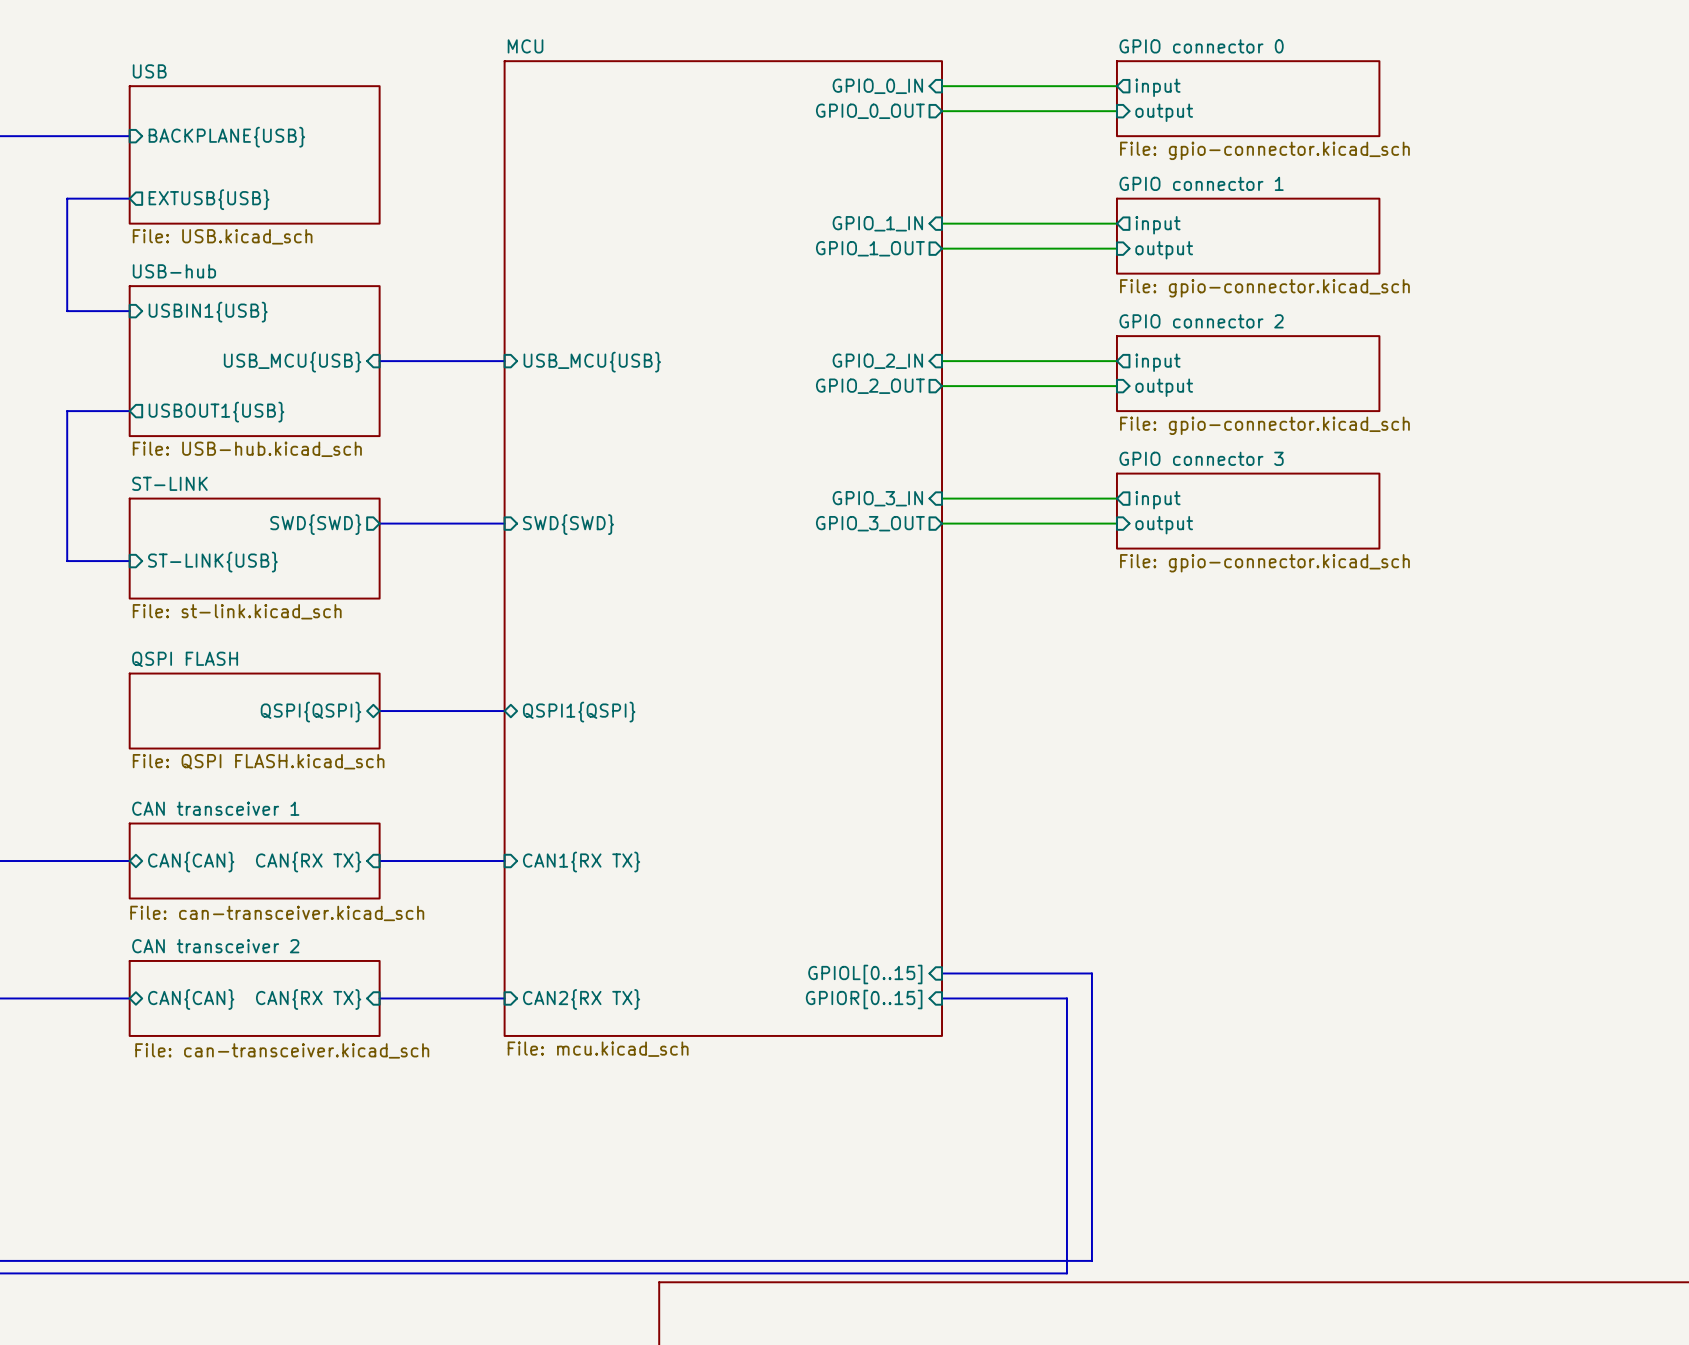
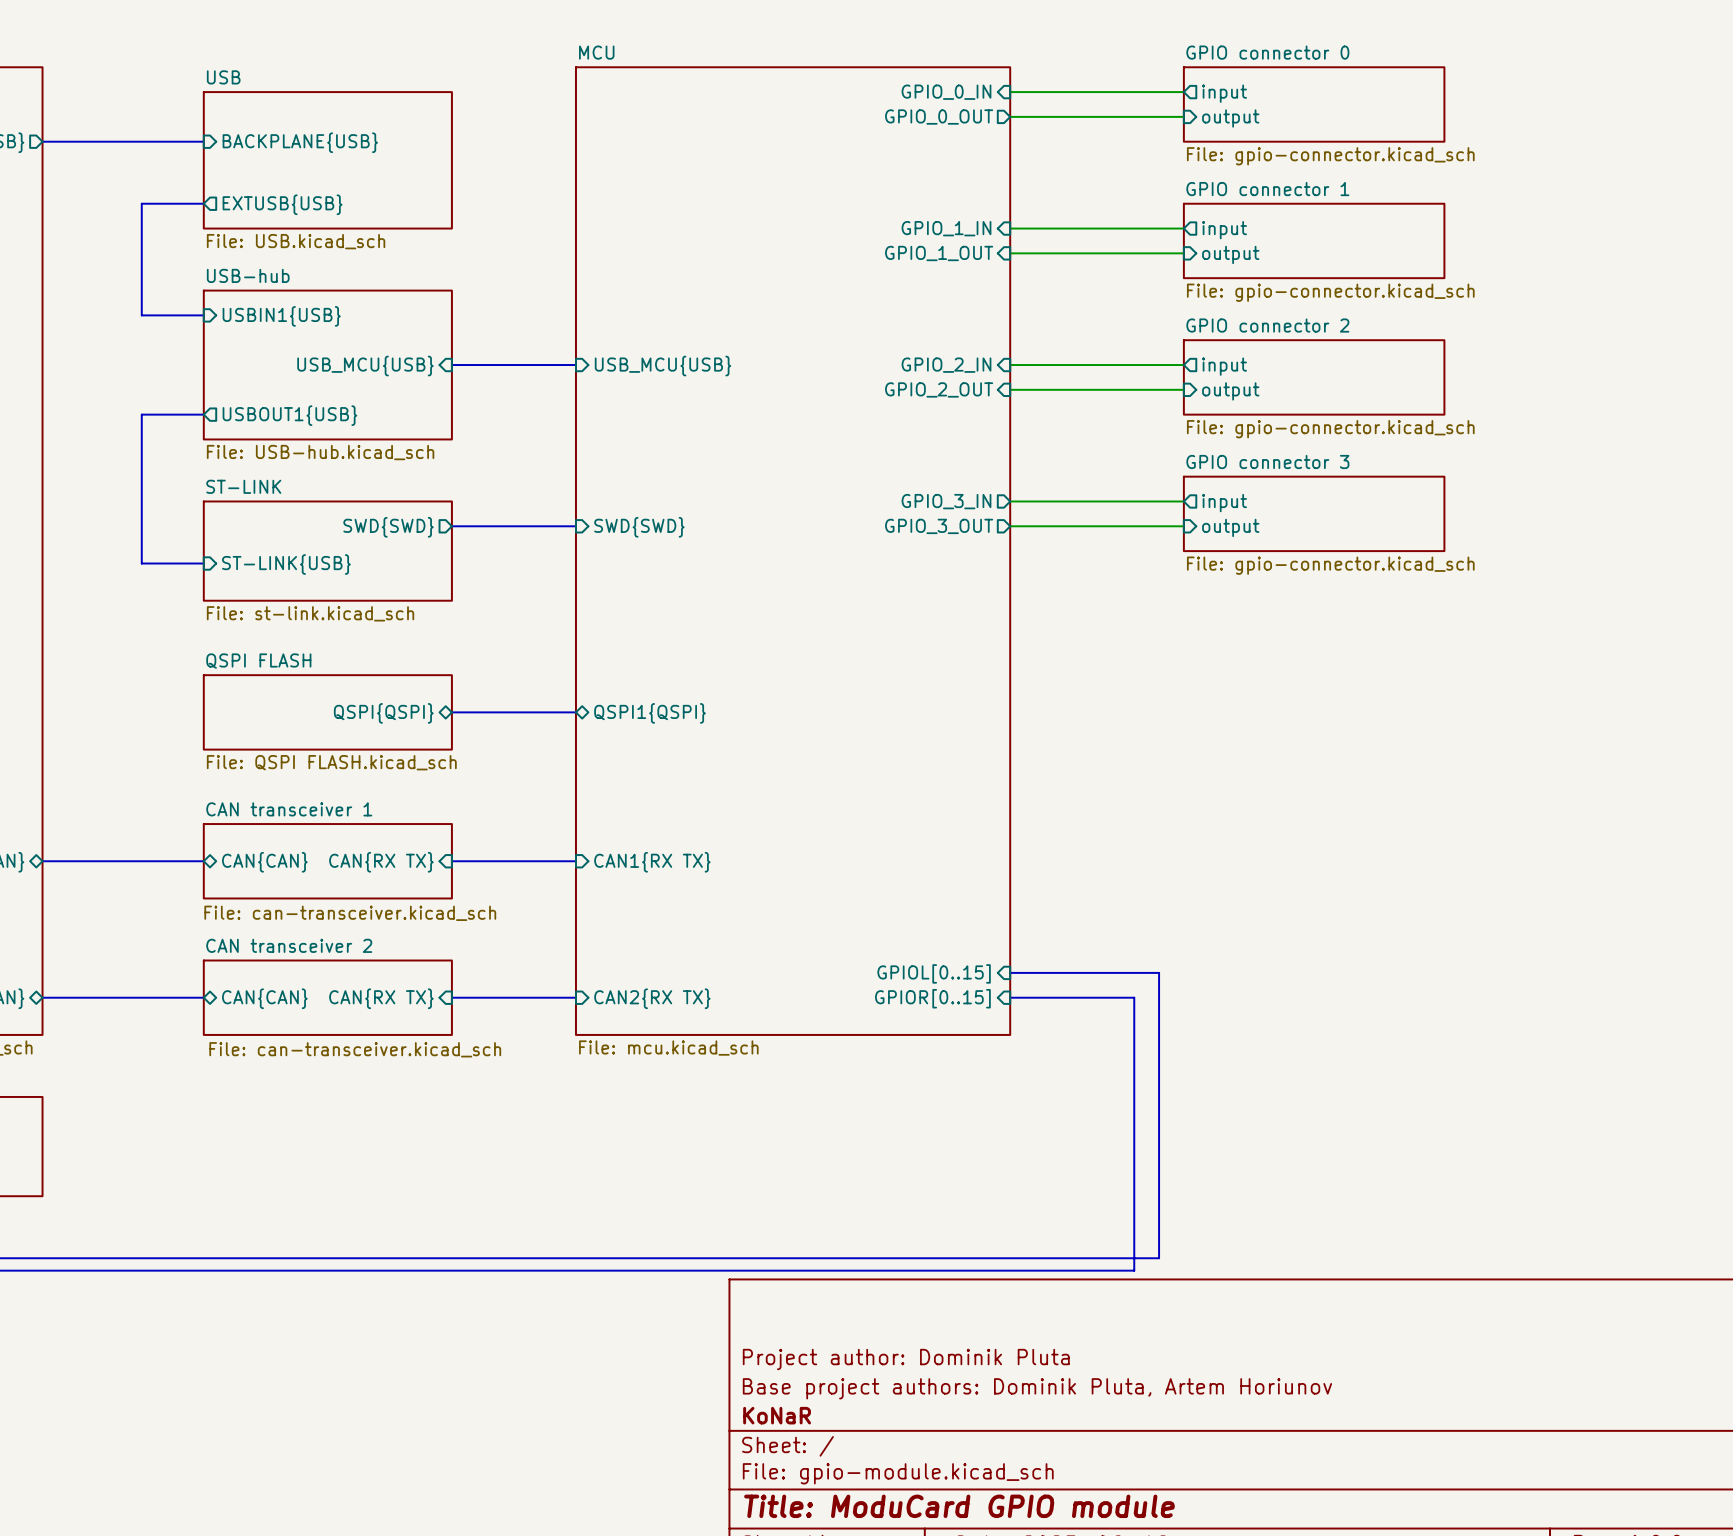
sheet pin shape: output (870, 248) -> input (939, 253)
sheet pin shape: output (870, 386) -> input (939, 389)
sheet pin shape: input (877, 498) -> output (946, 501)

